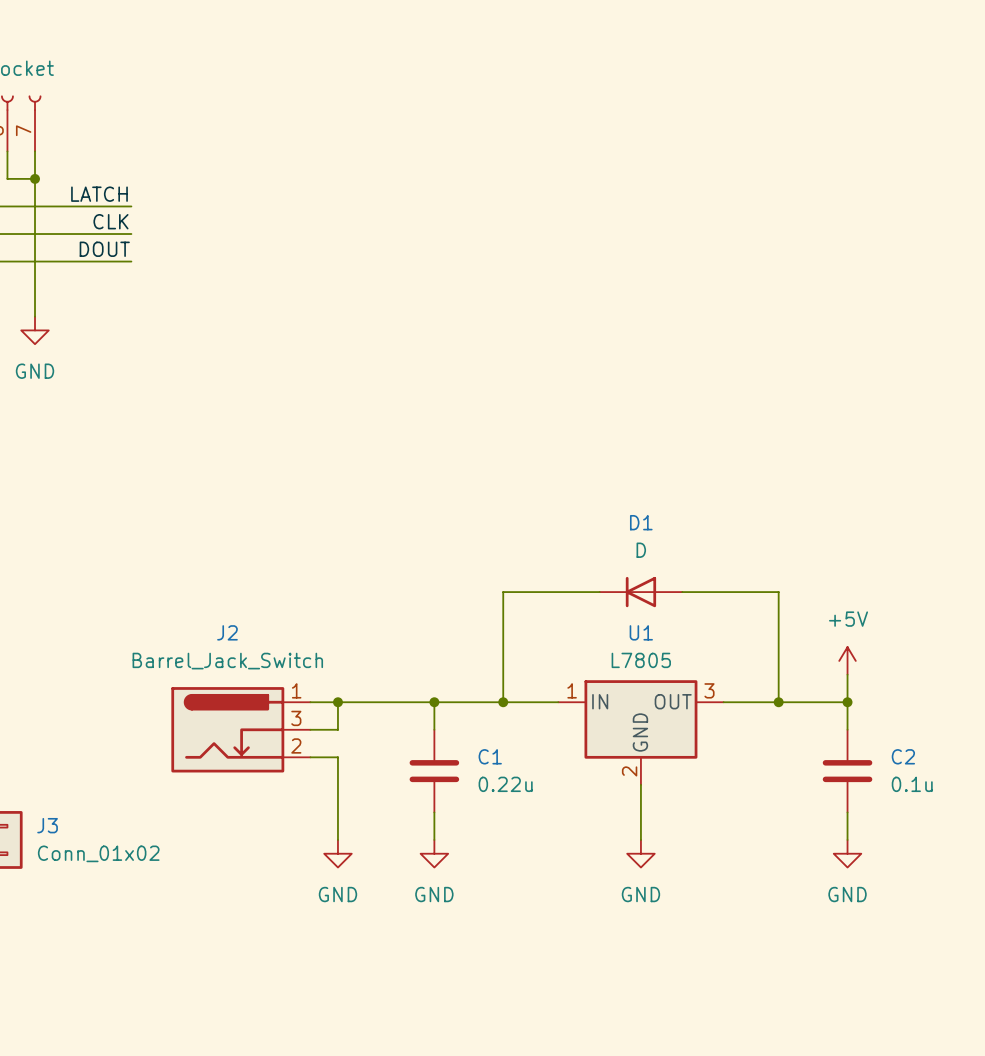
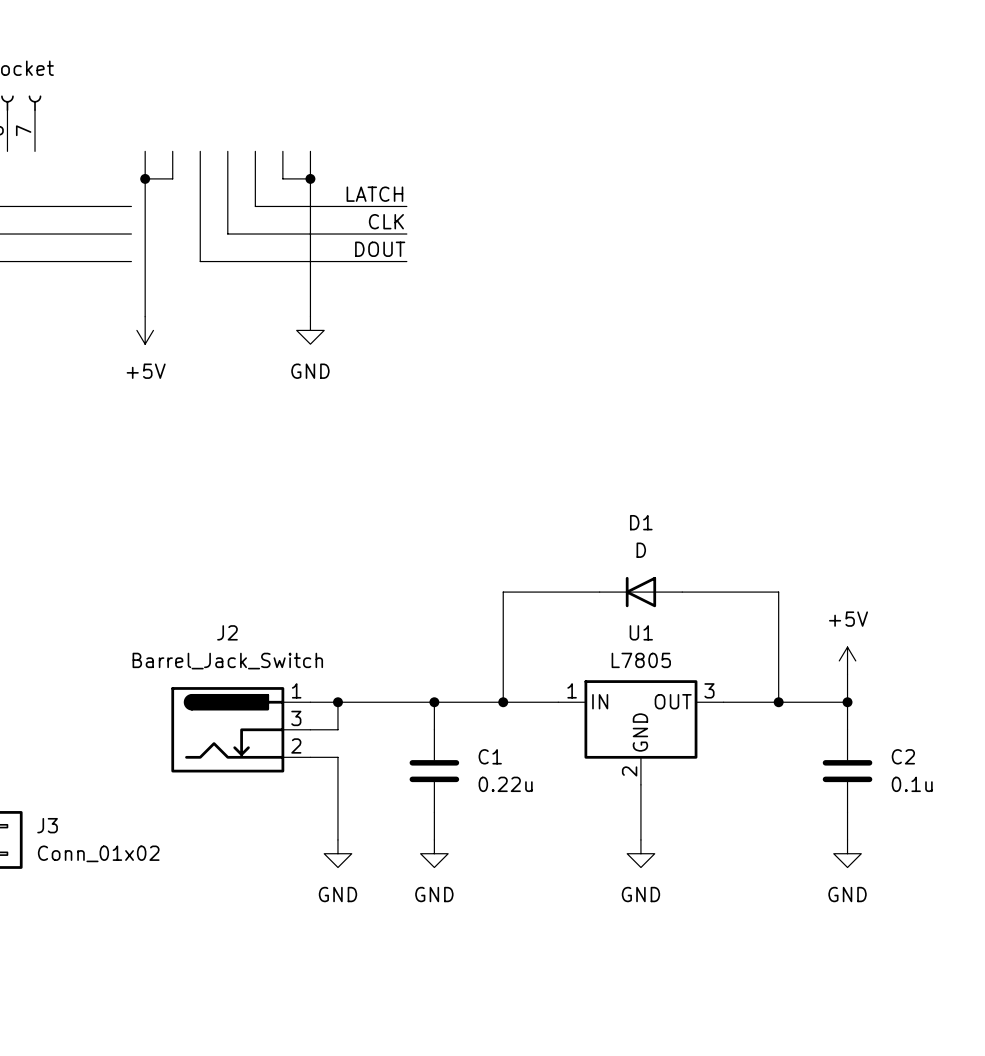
wire: (7, 151) (7, 178) (35, 178) -> none
wire: (35, 151) (35, 316) -> (145, 151) (145, 316)
wire: none -> (172, 151) (172, 178) (145, 178)
wire: none -> (200, 151) (200, 261) (406, 261)
wire: none -> (227, 151) (227, 234) (406, 234)
wire: none -> (255, 151) (255, 206) (406, 206)
wire: none -> (282, 151) (282, 178) (310, 178)
wire: none -> (310, 151) (310, 316)
junction: (35, 178) -> none
junction: none -> (145, 178)
junction: none -> (310, 178)
label: LATCH (99, 194) -> none
label: none -> LATCH (374, 194)
label: CLK (110, 221) -> none
label: none -> CLK (386, 221)
label: DOUT (104, 249) -> none
label: none -> DOUT (380, 249)
power symbol: GND (35, 330) -> none
power symbol: none -> +5V (145, 330)
power symbol: none -> GND (310, 330)

